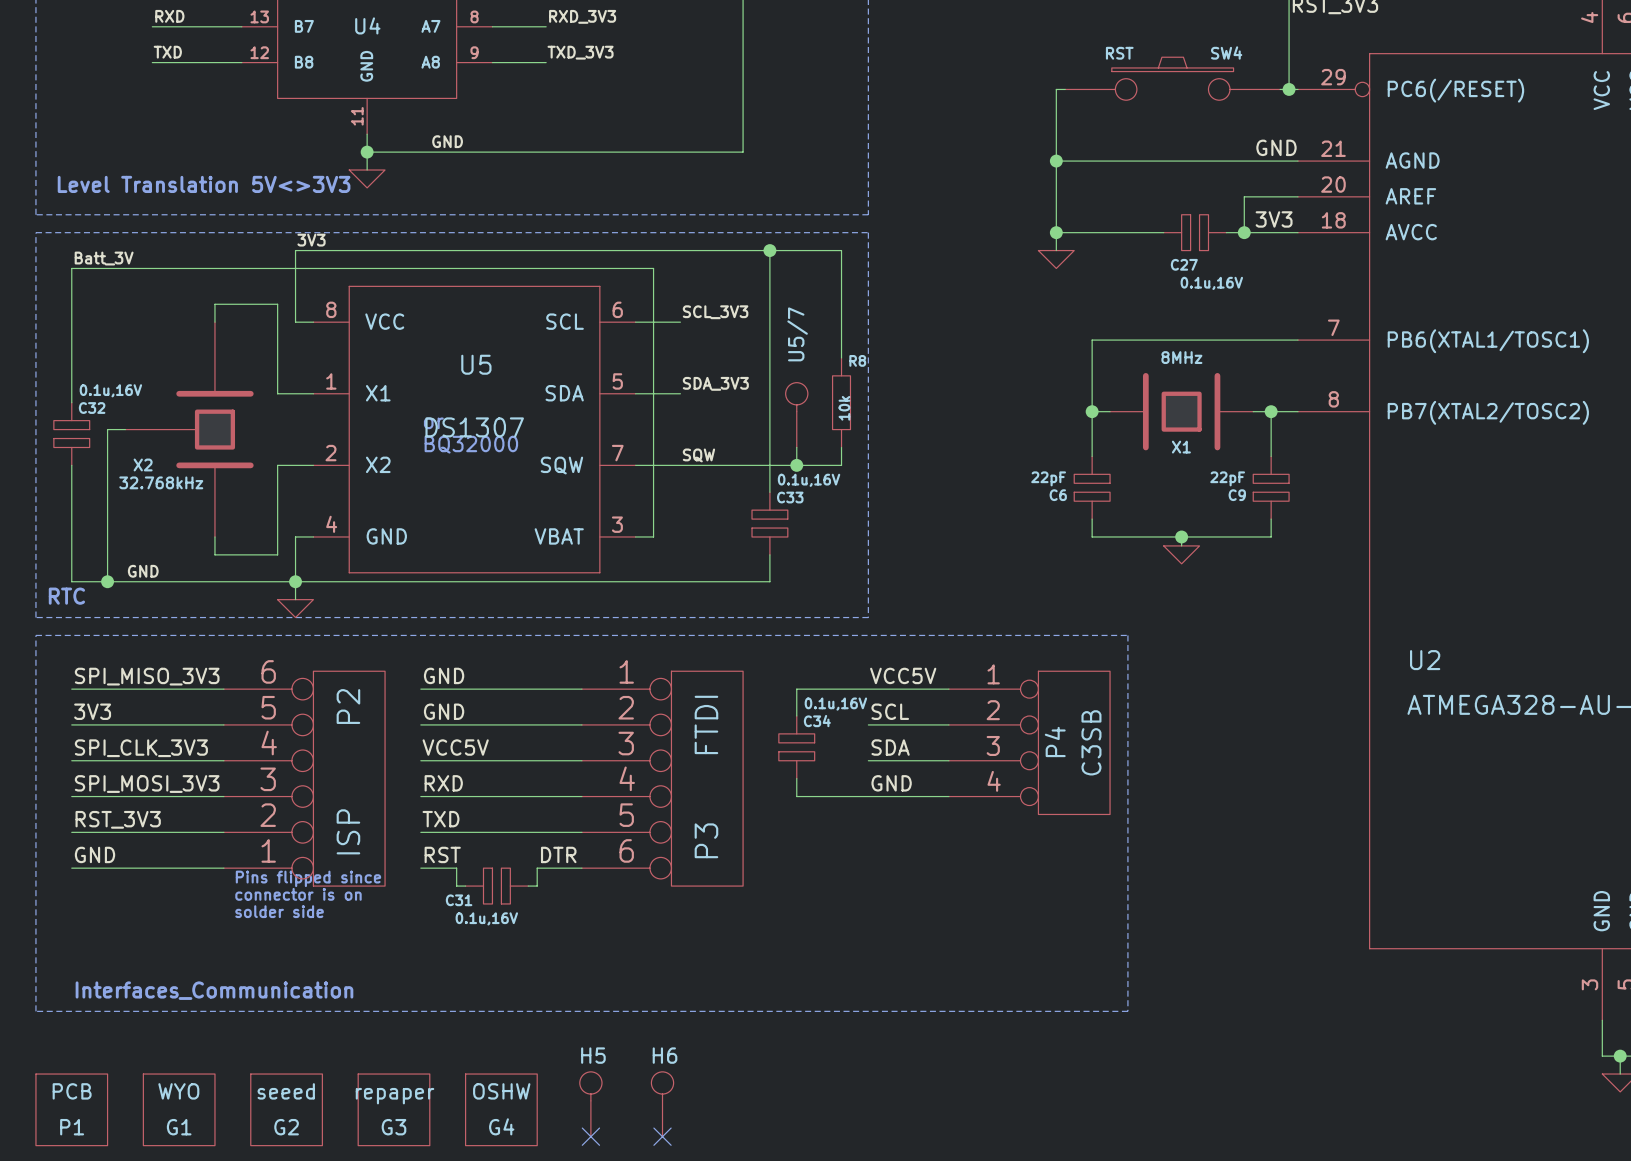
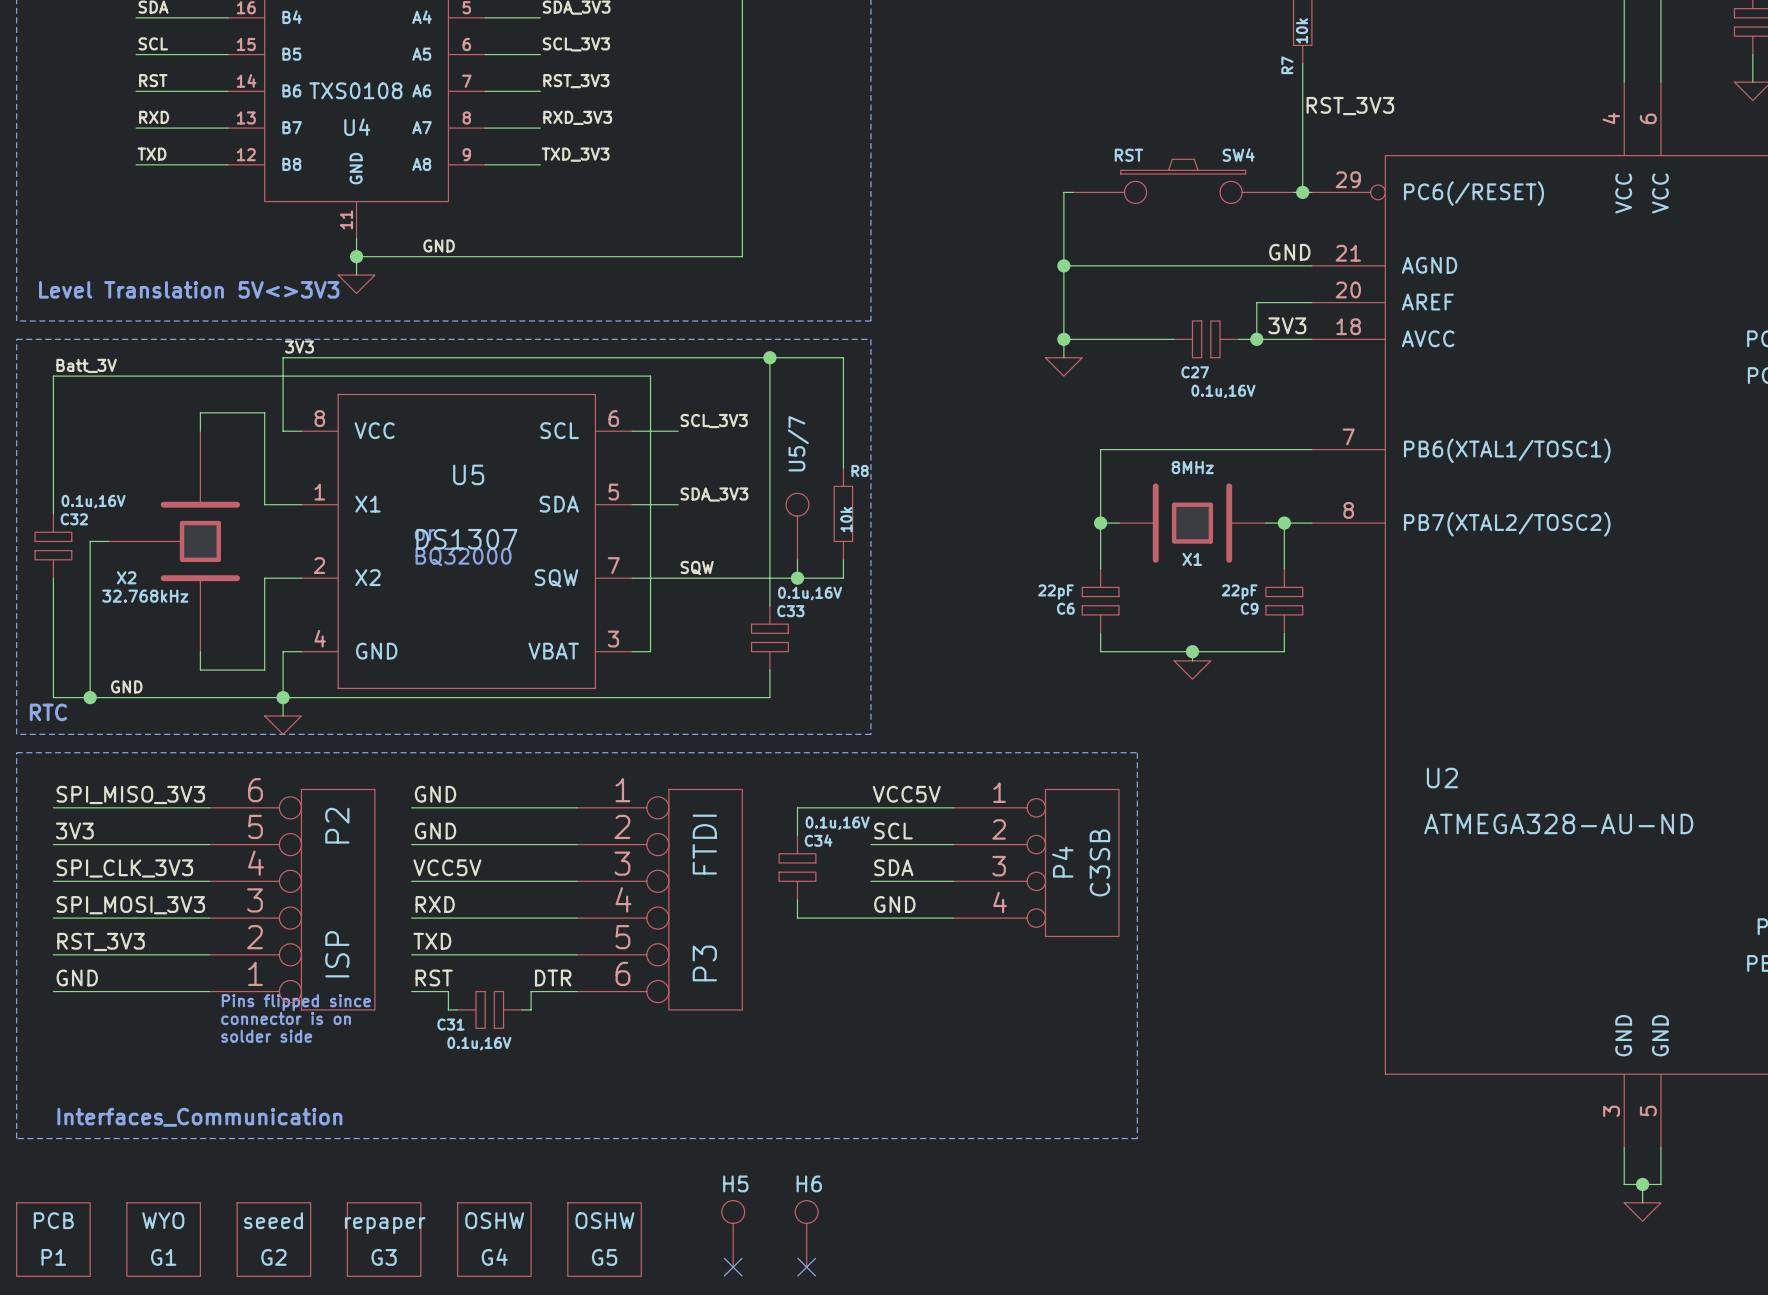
H5 position: (590, 1104) -> (733, 1233)
H6 position: (662, 1104) -> (806, 1233)
G5: none -> OSHW (604, 1239)
no-connect mark: (590, 1136) -> none
no-connect mark: (662, 1136) -> none
no-connect mark: none -> (733, 1267)
no-connect mark: none -> (806, 1267)

